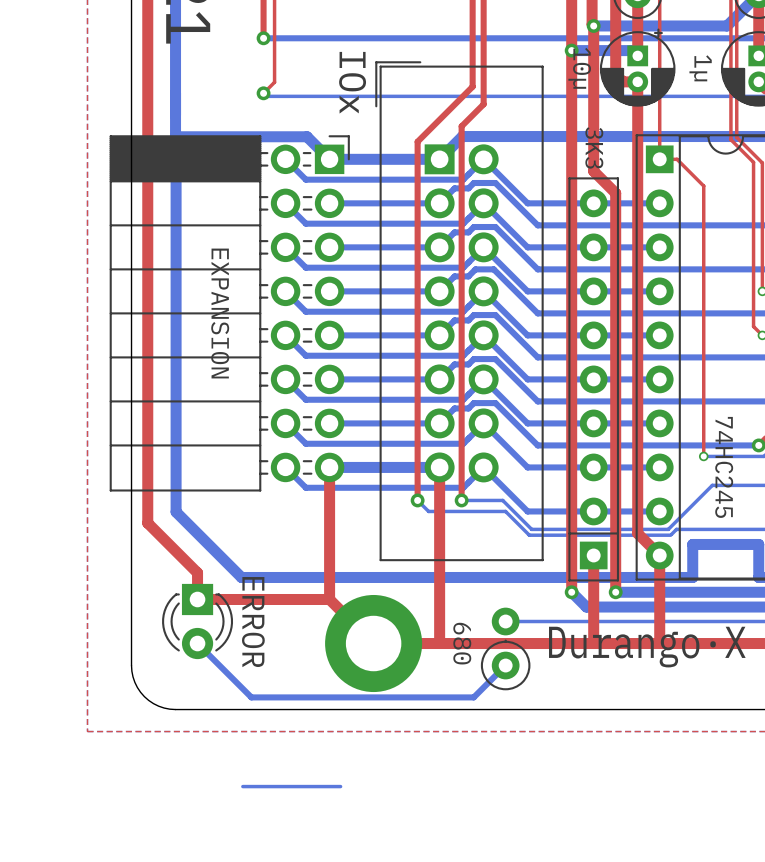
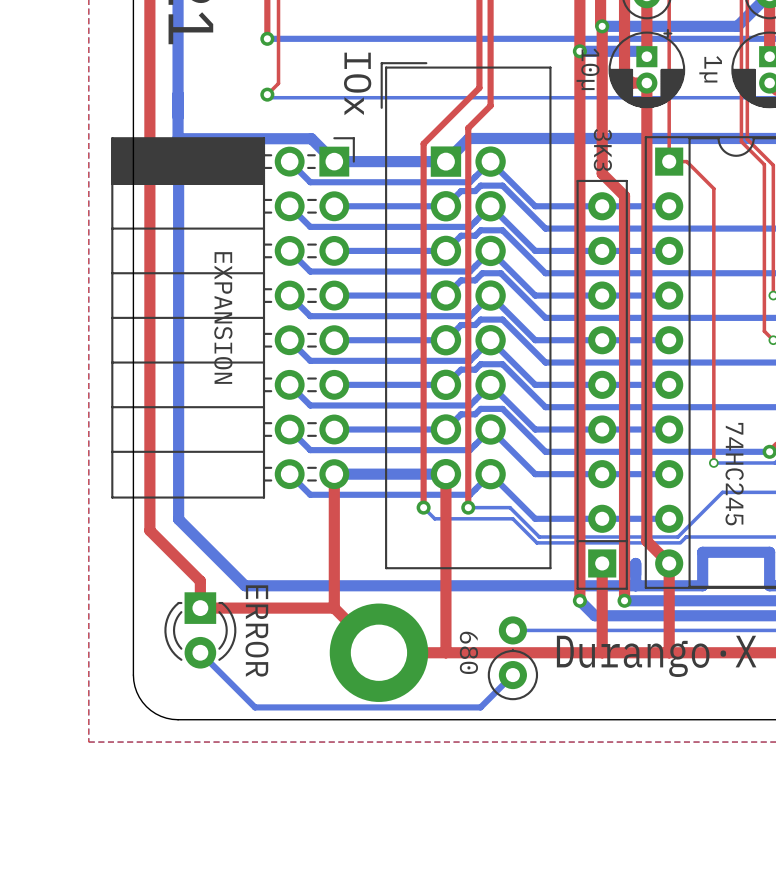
bottom track: none -> (635, 563) (635, 585)
bottom track: (242, 786) (340, 786) -> none

